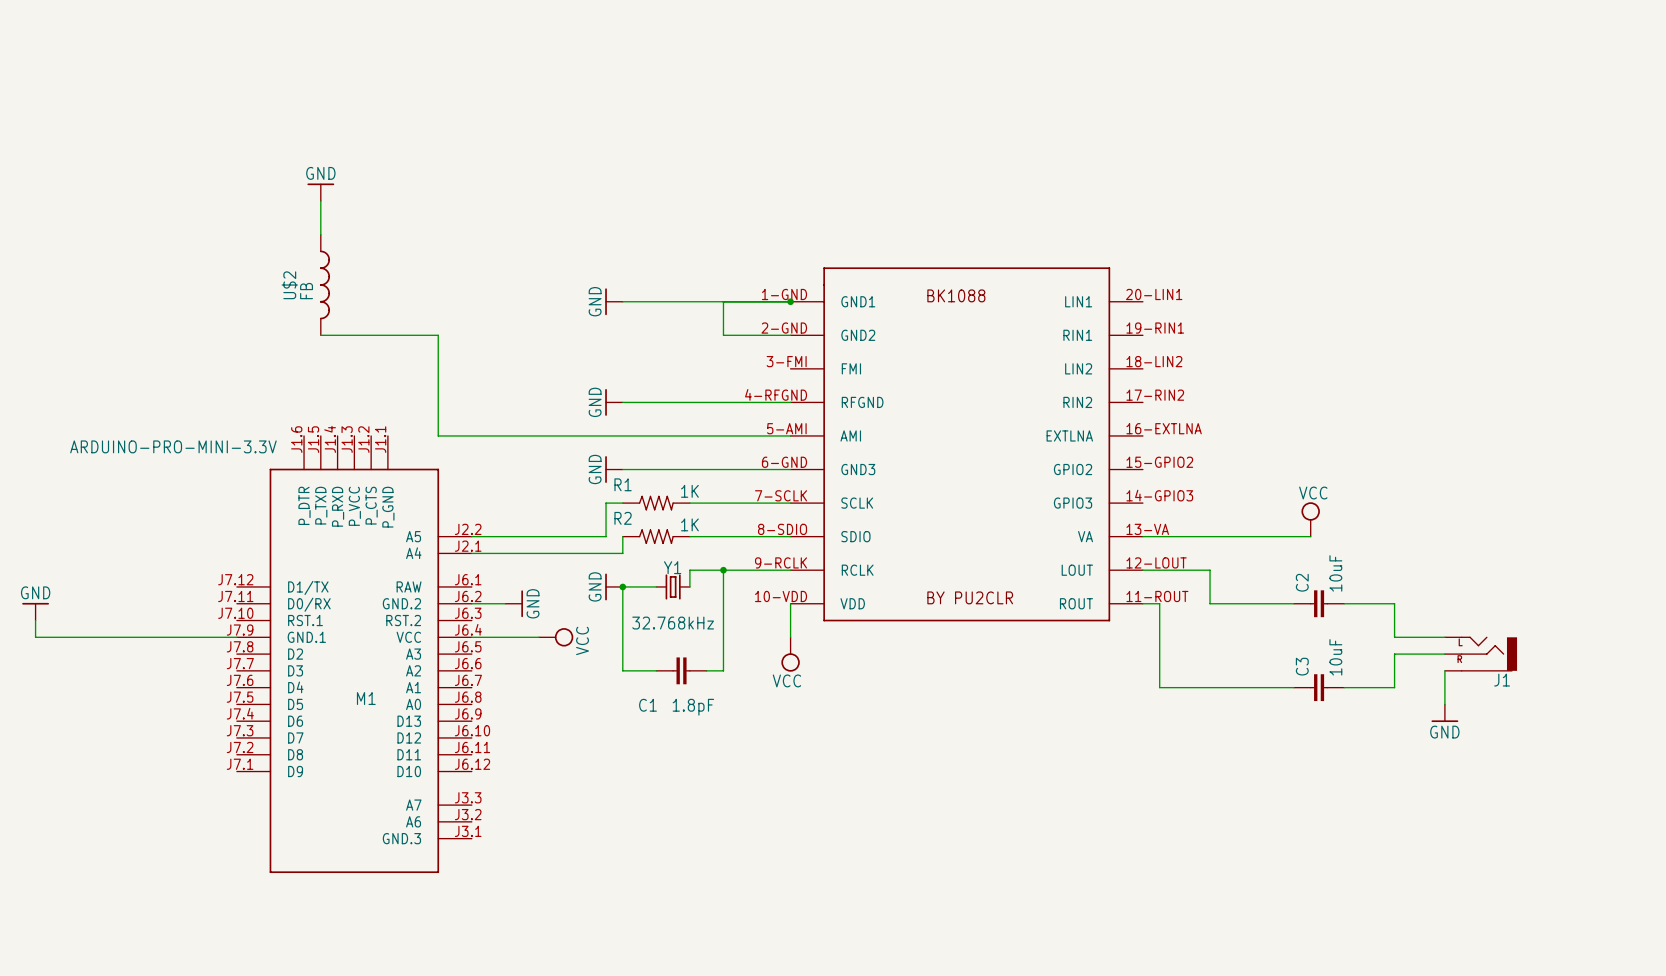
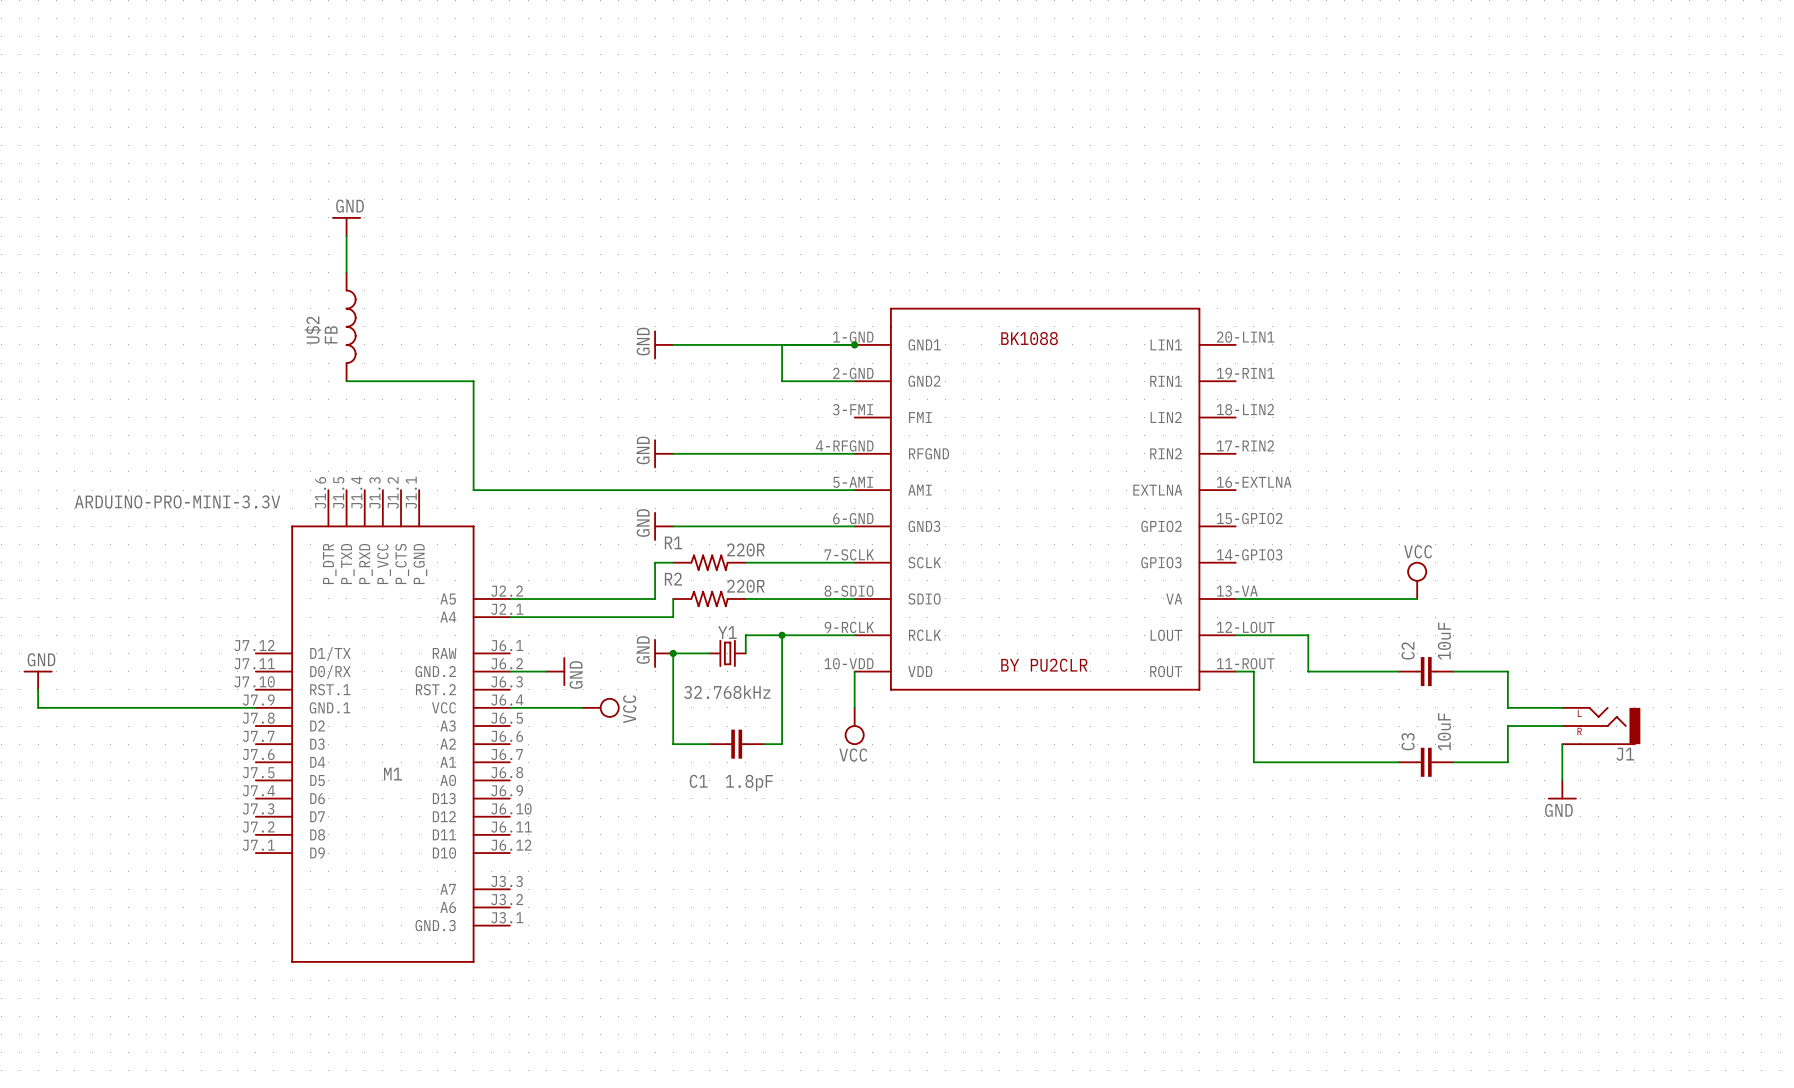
R1 value: 1K (689, 491) -> 220R (745, 549)
R2 value: 1K (689, 524) -> 220R (745, 586)

